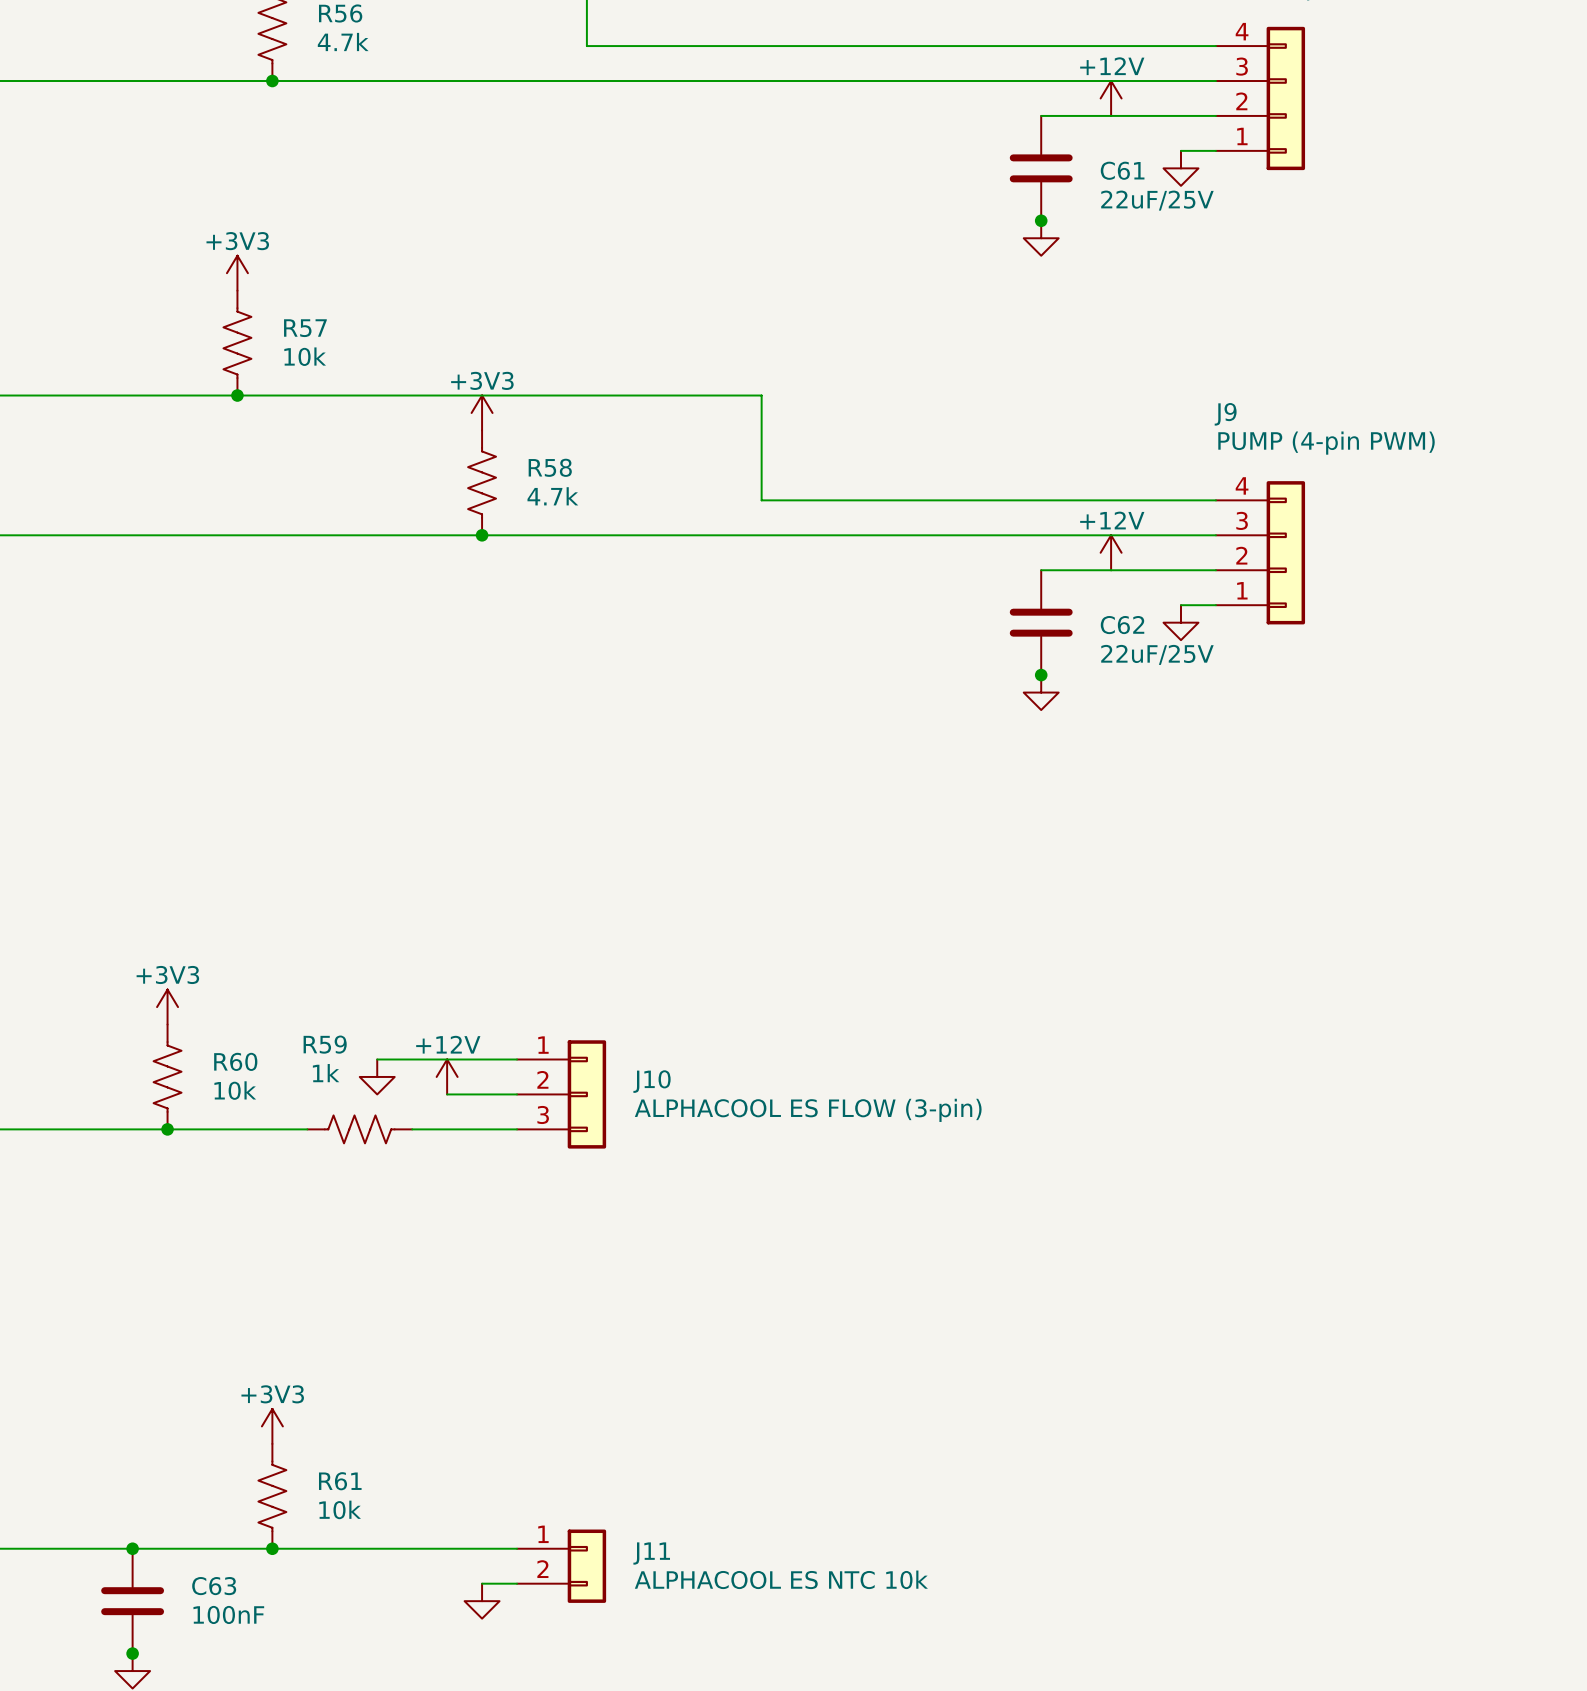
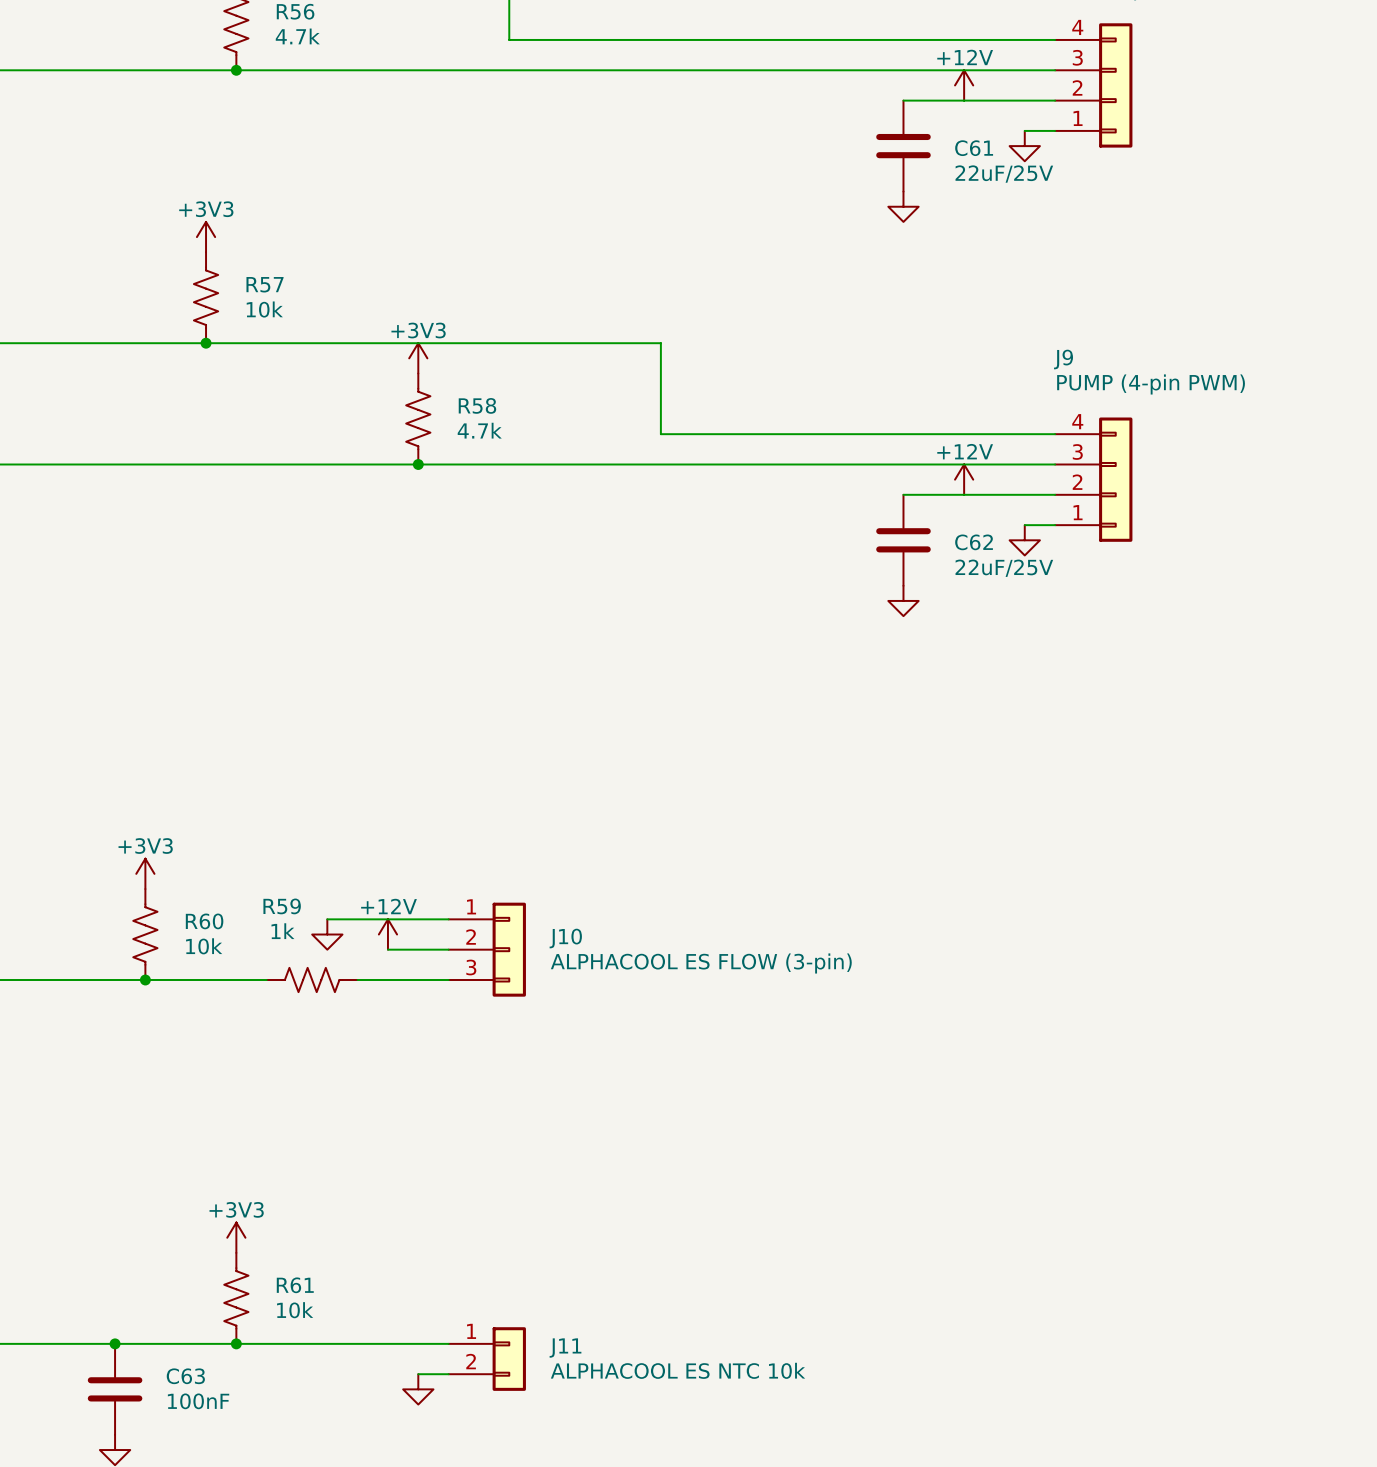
junction: (1041, 220) -> none
junction: (1041, 675) -> none
junction: (132, 1653) -> none

